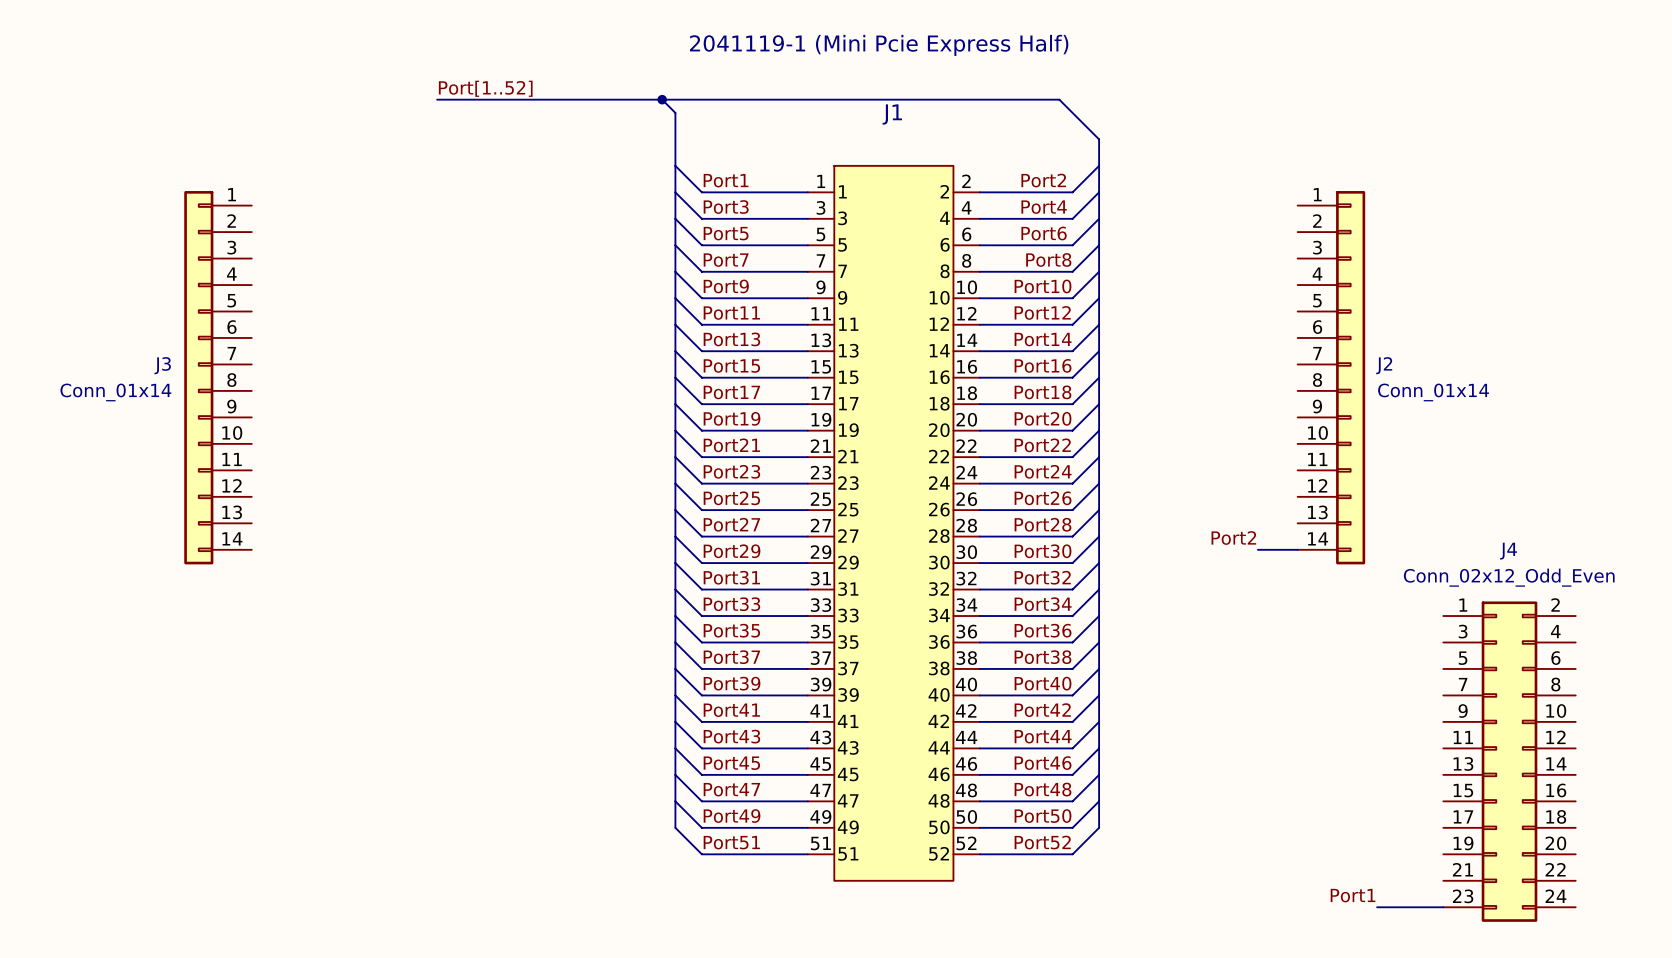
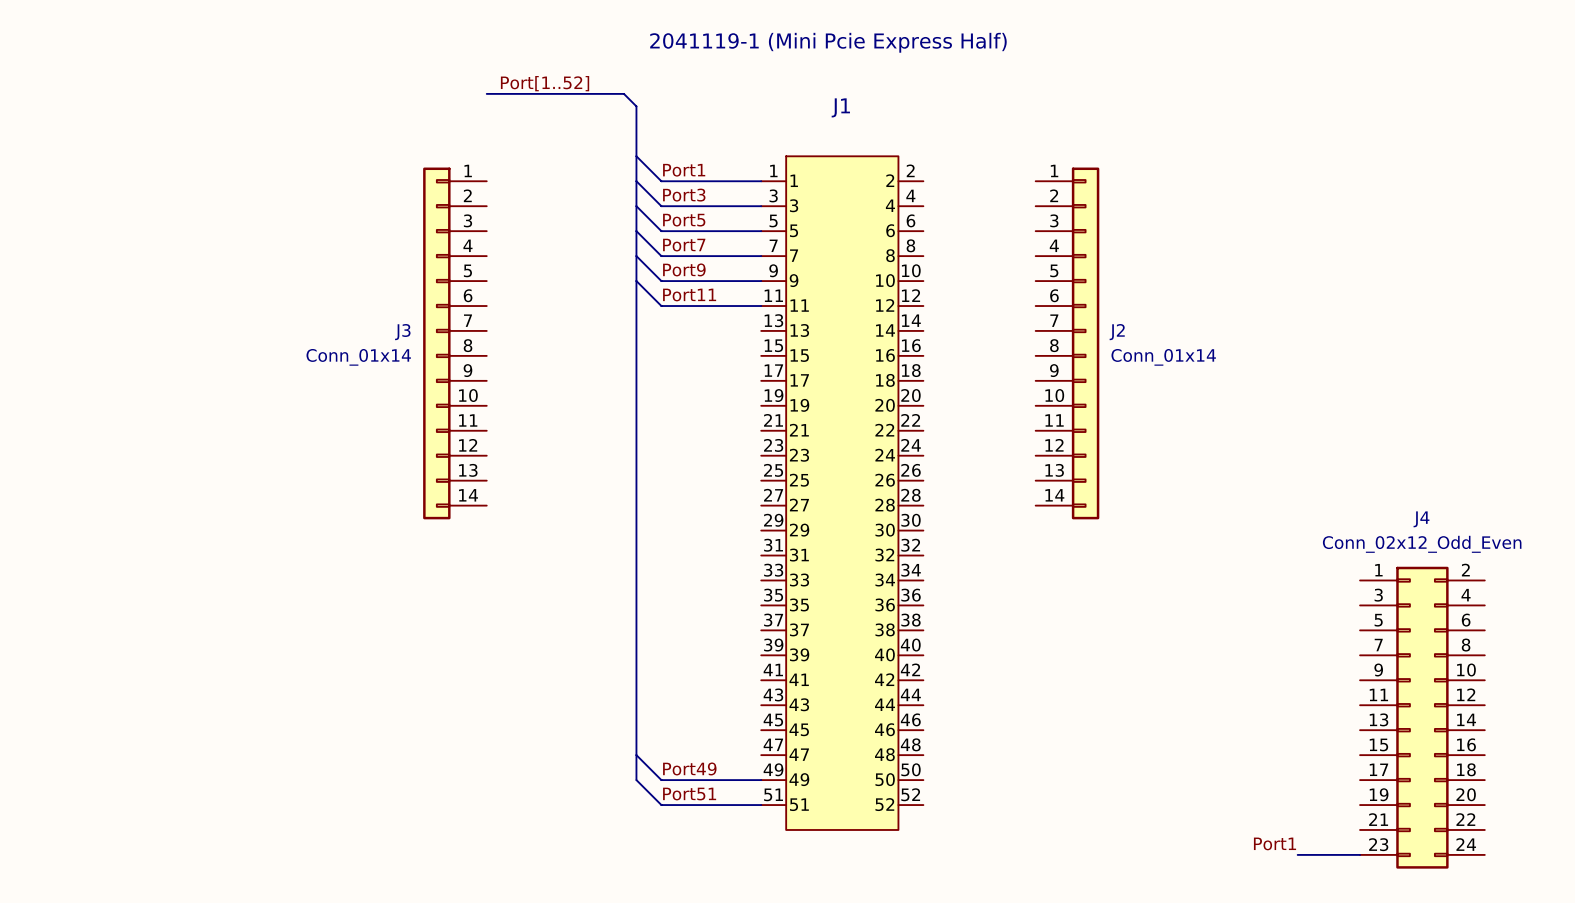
label position: Port[1..52] (485, 88) -> Port[1..52] (545, 83)
bus: (437, 99) (516, 99) -> none
bus: (662, 99) (1059, 99) (1099, 139) (1099, 827) -> none
junction: (662, 99) -> none
wire: (1099, 165) (1072, 192) (979, 192) -> none
label: Port2 (1043, 180) -> none
wire: (1099, 192) (1072, 218) (979, 218) -> none
label: Port4 (1044, 207) -> none
wire: (1099, 218) (1072, 245) (979, 245) -> none
label: Port6 (1044, 233) -> none
wire: (1099, 245) (1072, 271) (979, 271) -> none
label: Port8 (1048, 259) -> none
wire: (1099, 271) (1072, 298) (979, 298) -> none
label: Port10 (1043, 286) -> none
wire: (1099, 298) (1072, 324) (979, 324) -> none
label: Port12 (1042, 312) -> none
wire: (675, 324) (701, 351) (807, 351) -> none
wire: (1099, 324) (1072, 351) (979, 351) -> none
label: Port13 (731, 339) -> none
label: Port14 (1043, 339) -> none
wire: (675, 351) (701, 377) (807, 377) -> none
wire: (1099, 351) (1072, 377) (979, 377) -> none
label: Port16 (1043, 365) -> none
label: Port15 (731, 366) -> none
J3 position: (217, 377) -> (454, 343)
wire: (675, 377) (701, 404) (807, 404) -> none
wire: (1099, 377) (1072, 404) (979, 404) -> none
J2 position: (1331, 377) -> (1067, 343)
label: Port17 (731, 392) -> none
label: Port18 (1042, 392) -> none
wire: (675, 404) (701, 430) (807, 430) -> none
wire: (1099, 404) (1072, 430) (979, 430) -> none
label: Port19 (732, 418) -> none
label: Port20 (1043, 418) -> none
wire: (675, 430) (701, 457) (807, 457) -> none
wire: (1099, 430) (1072, 457) (979, 457) -> none
label: Port21 (731, 445) -> none
label: Port22 (1042, 445) -> none
wire: (675, 457) (701, 483) (807, 483) -> none
wire: (1099, 457) (1072, 483) (979, 483) -> none
label: Port23 (731, 471) -> none
label: Port24 (1043, 471) -> none
wire: (675, 483) (701, 510) (807, 510) -> none
wire: (1099, 483) (1072, 510) (979, 510) -> none
label: Port25 (731, 498) -> none
label: Port26 (1043, 498) -> none
wire: (675, 510) (701, 536) (807, 536) -> none
wire: (1099, 510) (1072, 536) (979, 536) -> none
label: Port27 (731, 524) -> none
label: Port28 (1042, 524) -> none
wire: (675, 536) (701, 563) (807, 563) -> none
wire: (1099, 536) (1072, 563) (979, 563) -> none
label: Port2 (1233, 538) -> none
wire: (1257, 549) (1297, 549) -> none
label: Port29 (732, 551) -> none
label: Port30 (1043, 551) -> none
wire: (675, 563) (701, 589) (807, 589) -> none
wire: (1099, 563) (1072, 589) (979, 589) -> none
label: Port31 (731, 577) -> none
label: Port32 (1042, 577) -> none
wire: (675, 589) (701, 616) (807, 616) -> none
wire: (1099, 589) (1072, 616) (979, 616) -> none
label: Port33 (731, 604) -> none
label: Port34 (1043, 604) -> none
wire: (675, 616) (701, 642) (807, 642) -> none
wire: (1099, 616) (1072, 642) (979, 642) -> none
label: Port35 (731, 630) -> none
label: Port36 (1043, 630) -> none
wire: (675, 642) (701, 668) (807, 668) -> none
wire: (1099, 642) (1072, 668) (979, 668) -> none
label: Port37 (731, 657) -> none
label: Port38 (1042, 657) -> none
wire: (675, 668) (701, 695) (807, 695) -> none
wire: (1099, 668) (1072, 695) (979, 695) -> none
label: Port39 (732, 683) -> none
label: Port40 (1043, 683) -> none
wire: (675, 695) (701, 721) (807, 721) -> none
wire: (1099, 695) (1072, 721) (979, 721) -> none
label: Port41 (731, 710) -> none
label: Port42 (1042, 710) -> none
wire: (675, 721) (701, 748) (807, 748) -> none
wire: (1099, 721) (1072, 748) (979, 748) -> none
label: Port43 (731, 736) -> none
label: Port44 (1043, 736) -> none
wire: (675, 748) (701, 774) (807, 774) -> none
wire: (1099, 748) (1072, 774) (979, 774) -> none
label: Port45 (731, 763) -> none
label: Port46 (1043, 763) -> none
wire: (675, 774) (701, 801) (807, 801) -> none
wire: (1099, 774) (1072, 801) (979, 801) -> none
label: Port47 (731, 789) -> none
label: Port48 (1042, 789) -> none
wire: (1099, 801) (1072, 827) (979, 827) -> none
label: Port50 (1043, 816) -> none
wire: (1099, 827) (1072, 854) (979, 854) -> none
label: Port52 (1042, 842) -> none

